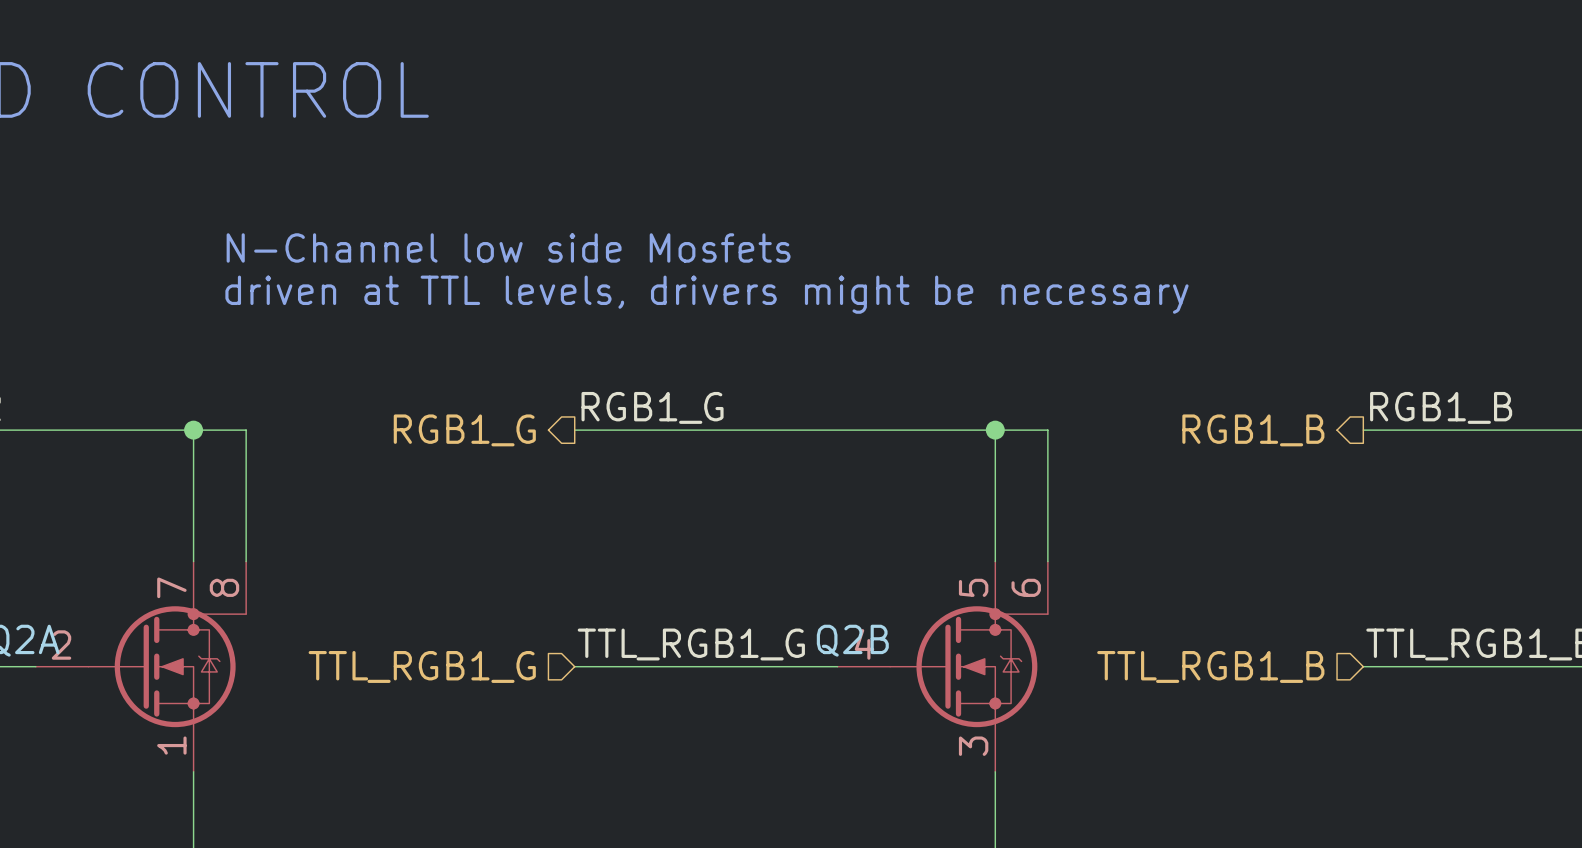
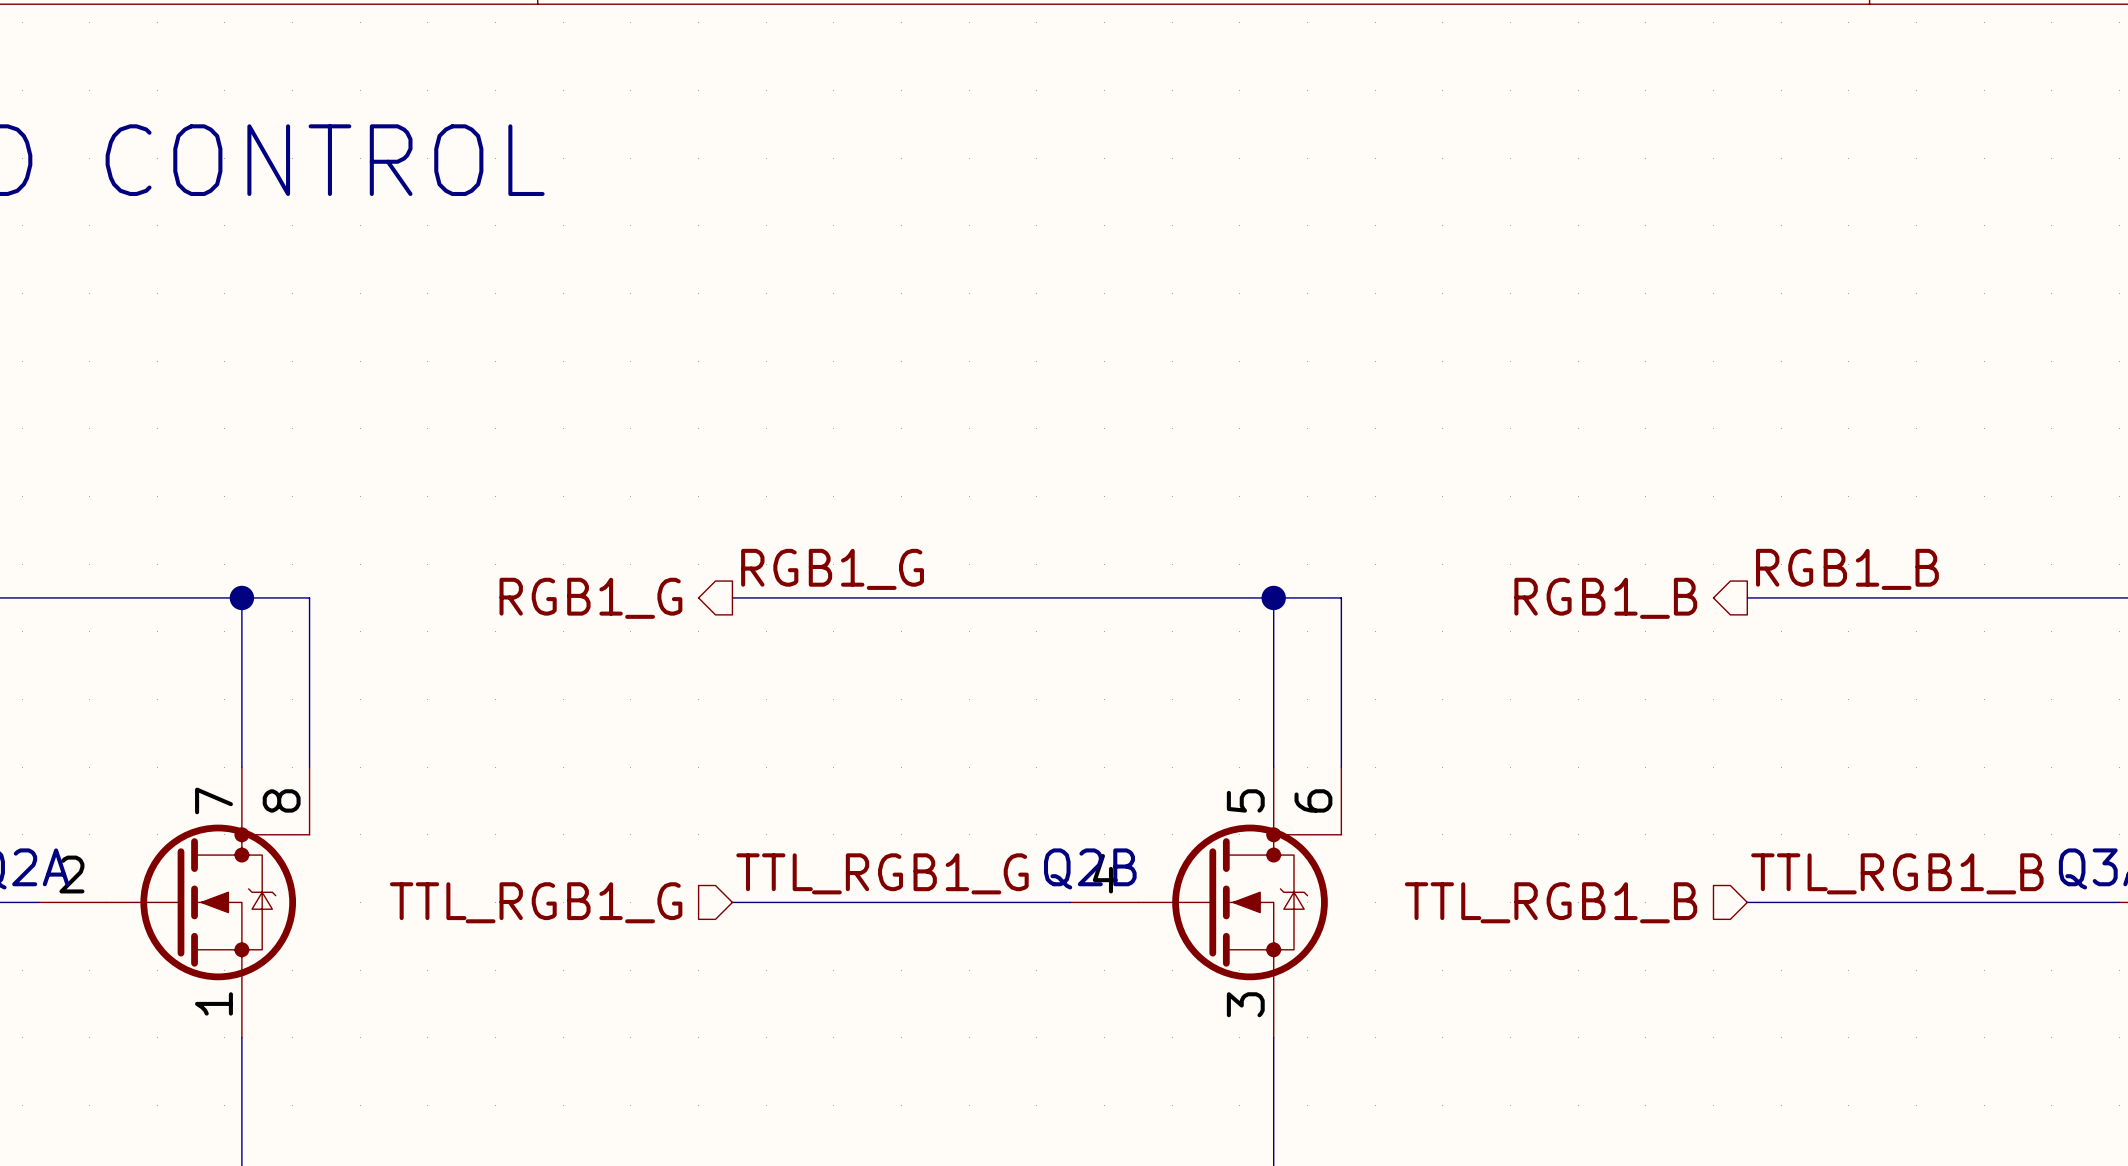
text: N-Channel low side Mosfets (508, 247) -> none
text: driven at TTL levels, drivers might be necessary (706, 294) -> none

